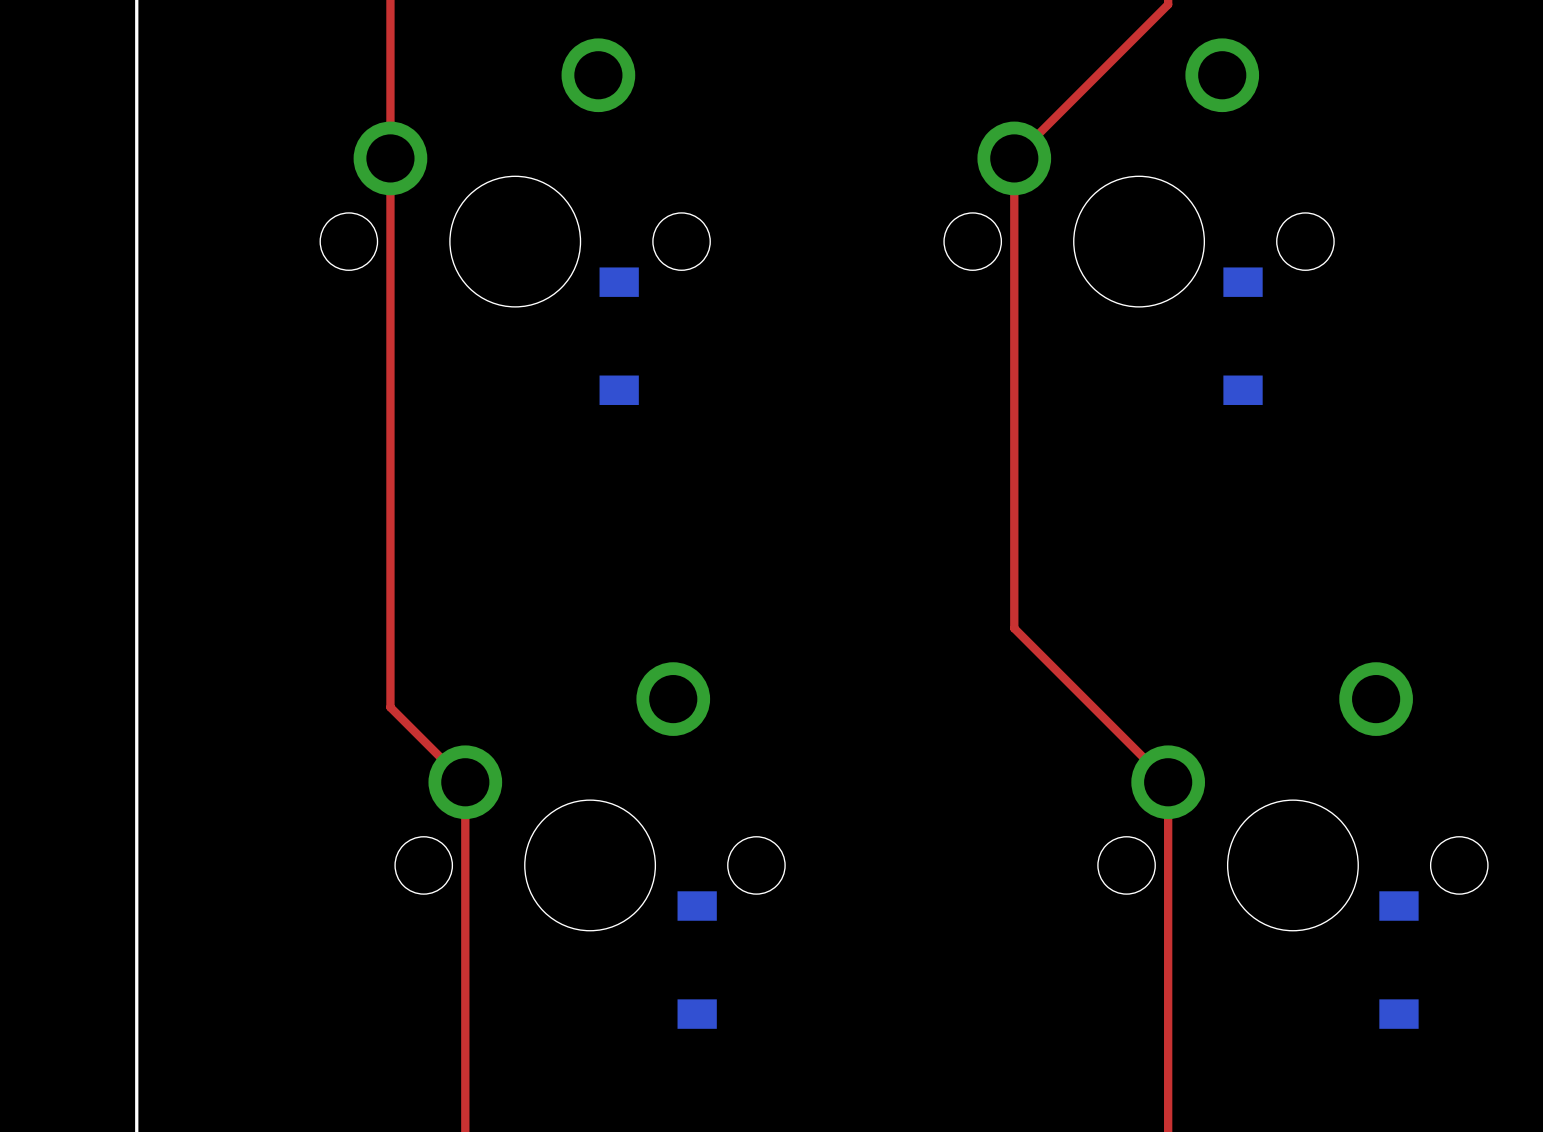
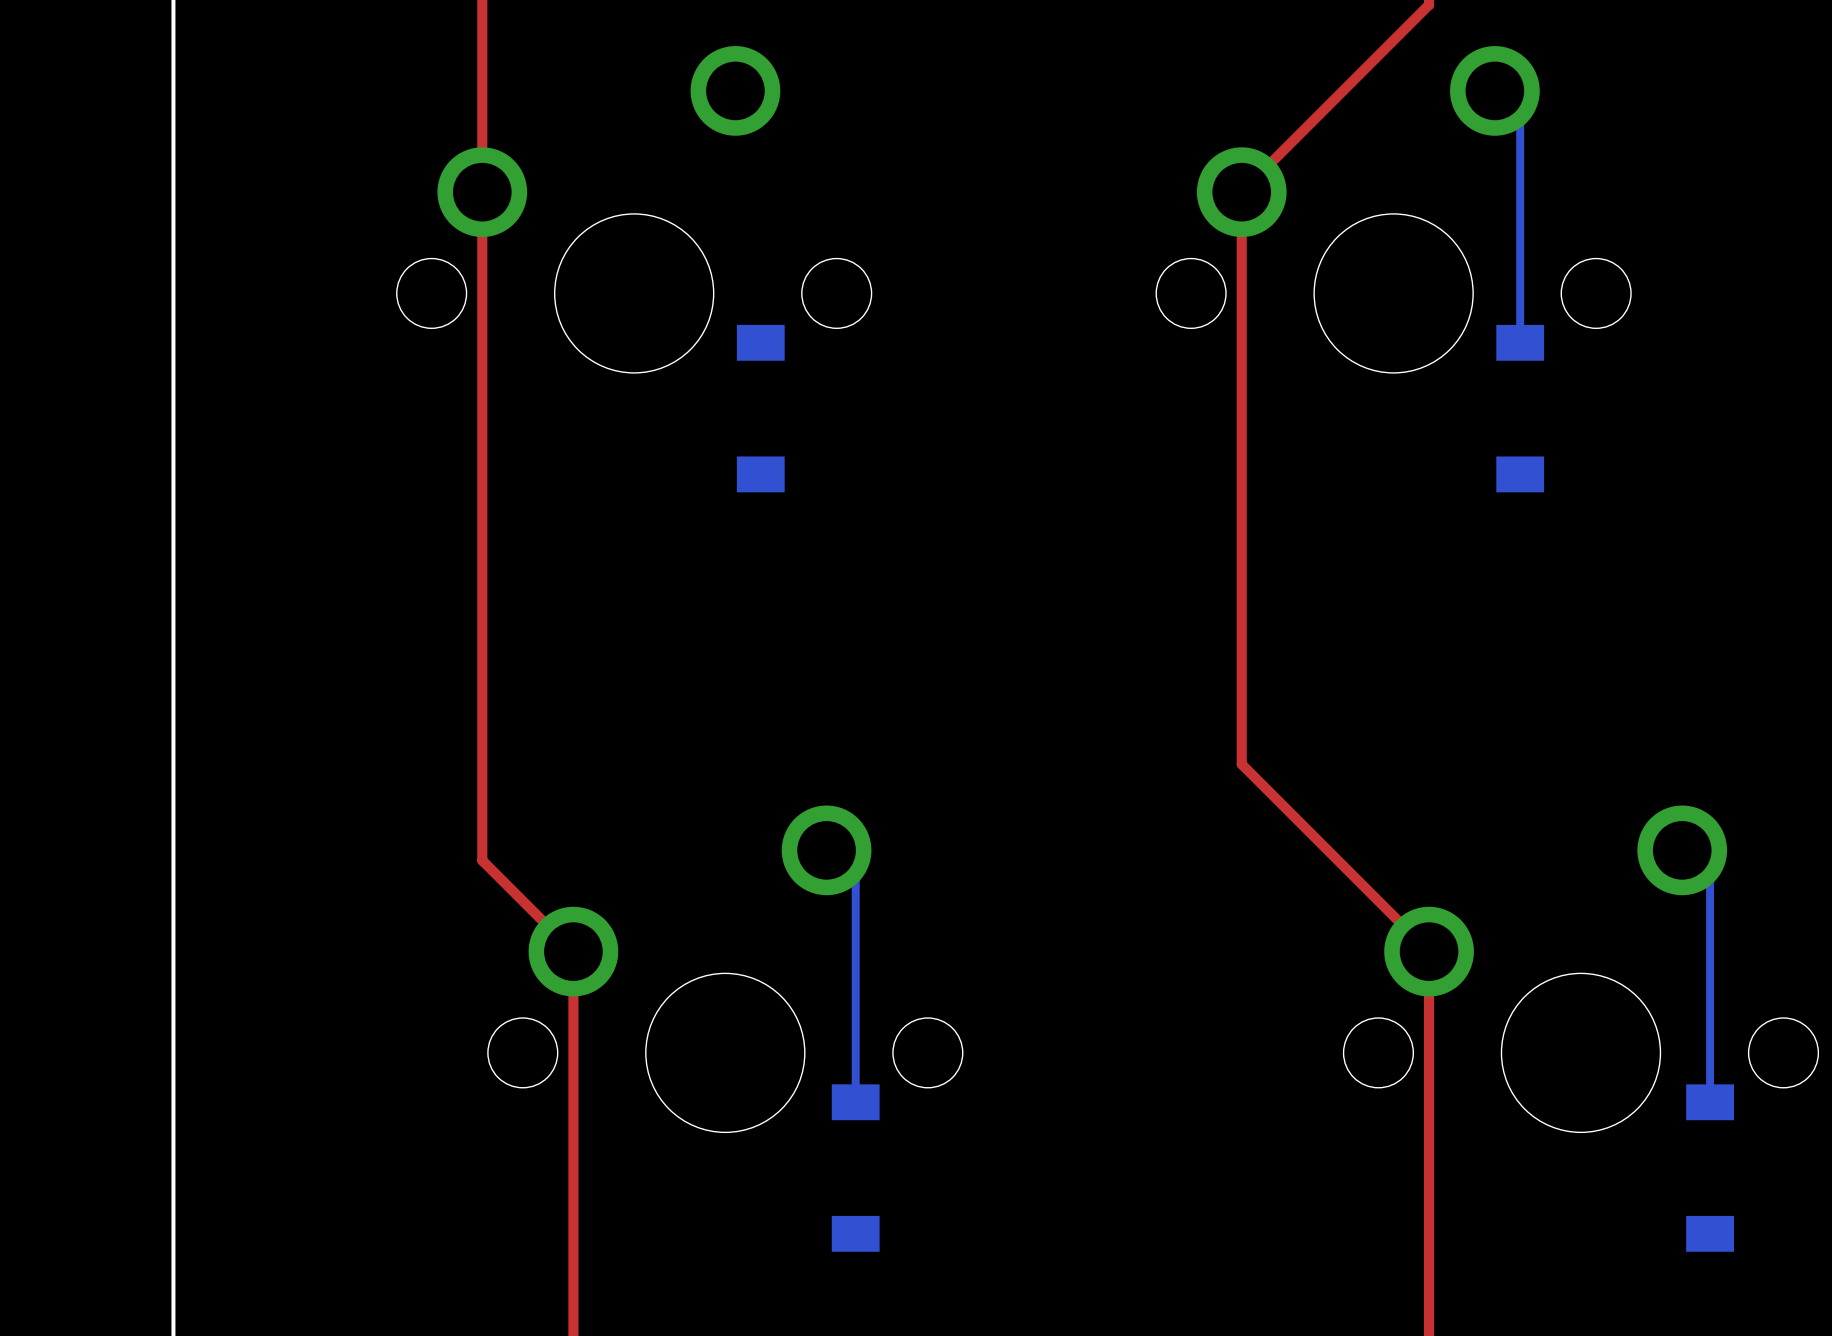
bottom track: none -> (1494, 90) (1520, 116) (1520, 342)
bottom track: none -> (826, 850) (855, 879) (855, 1102)
bottom track: none -> (1682, 850) (1710, 878) (1710, 1102)

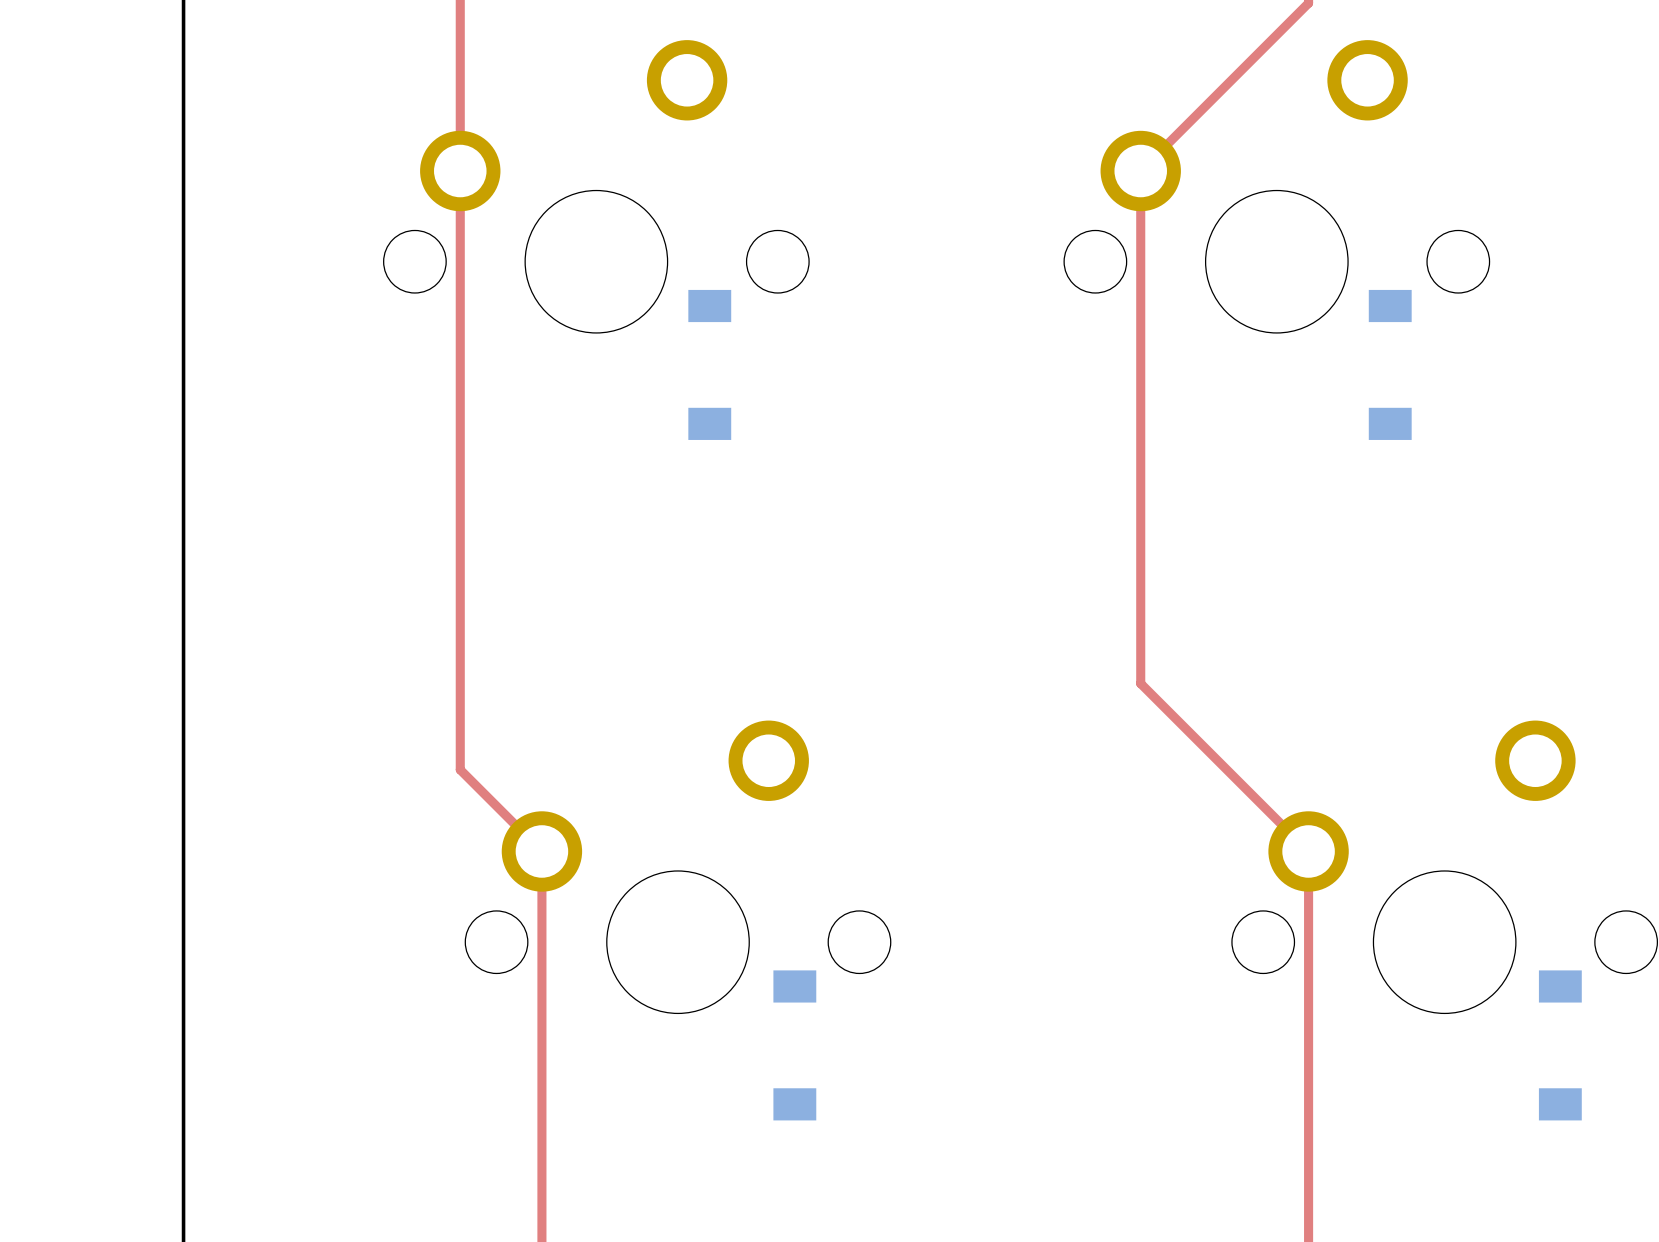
bottom track: (1494, 90) (1520, 116) (1520, 342) -> none
bottom track: (826, 850) (855, 879) (855, 1102) -> none
bottom track: (1682, 850) (1710, 878) (1710, 1102) -> none

